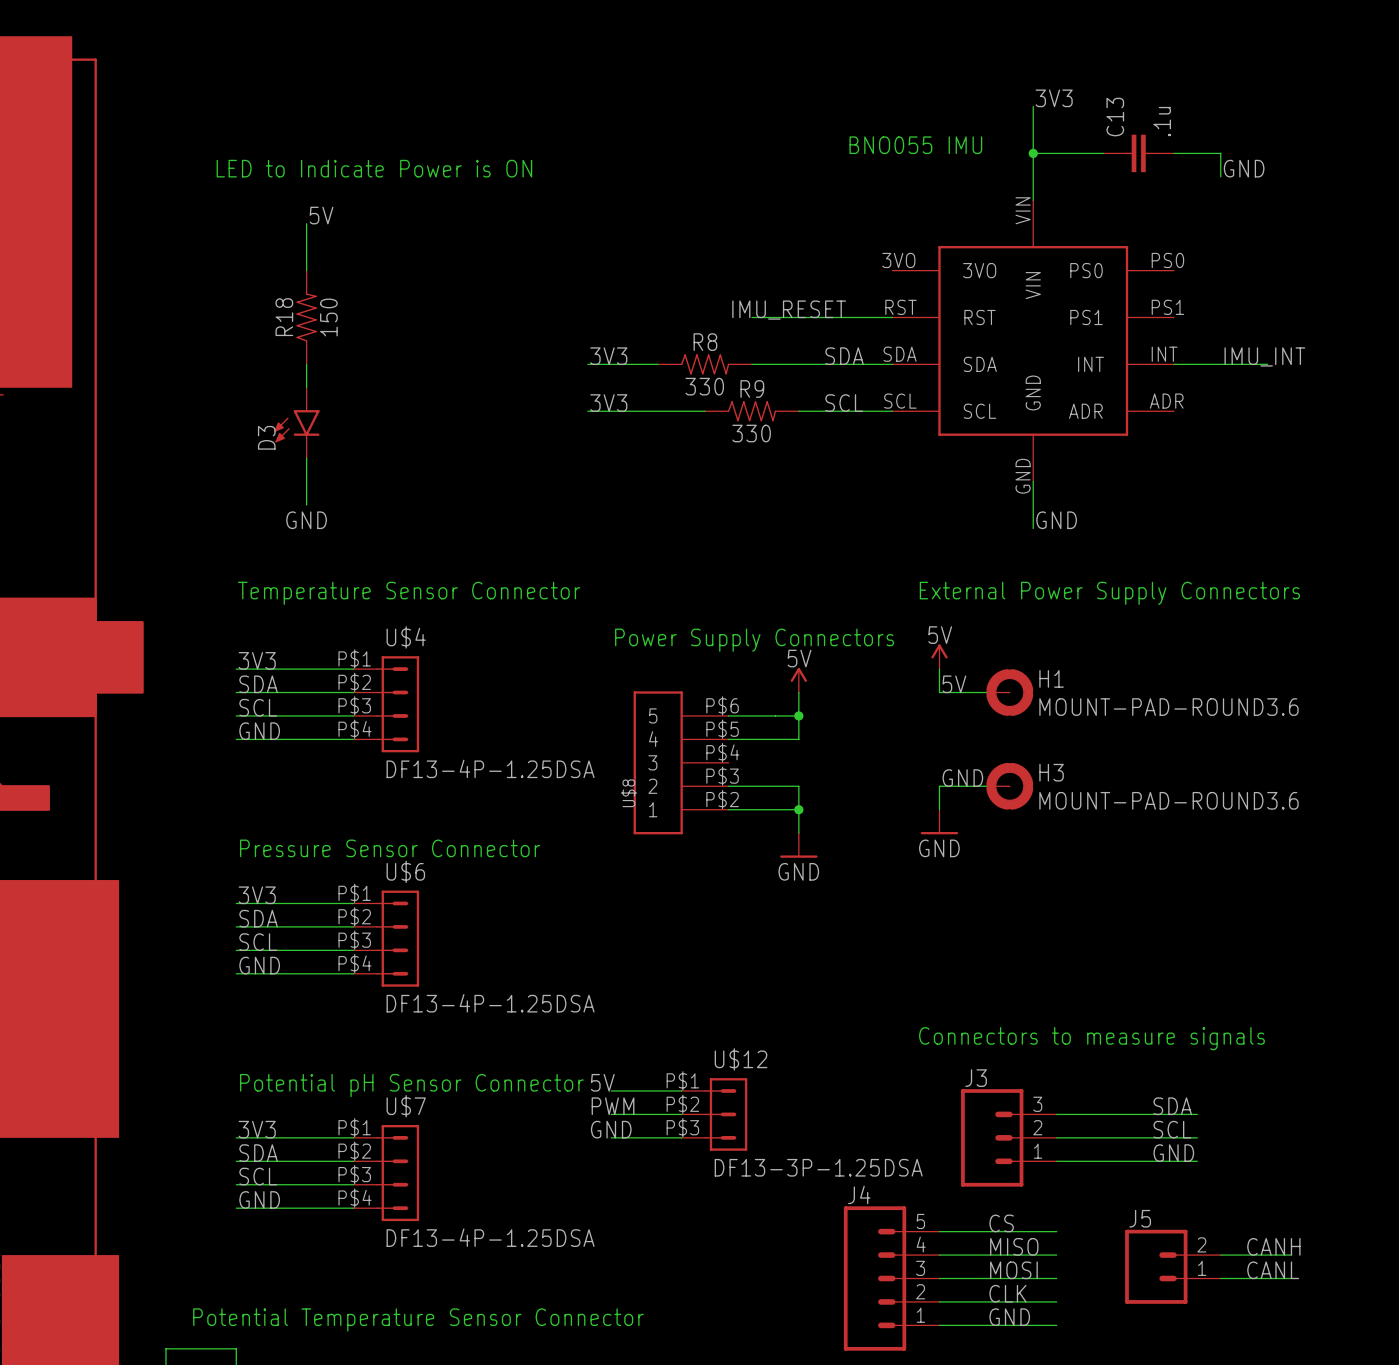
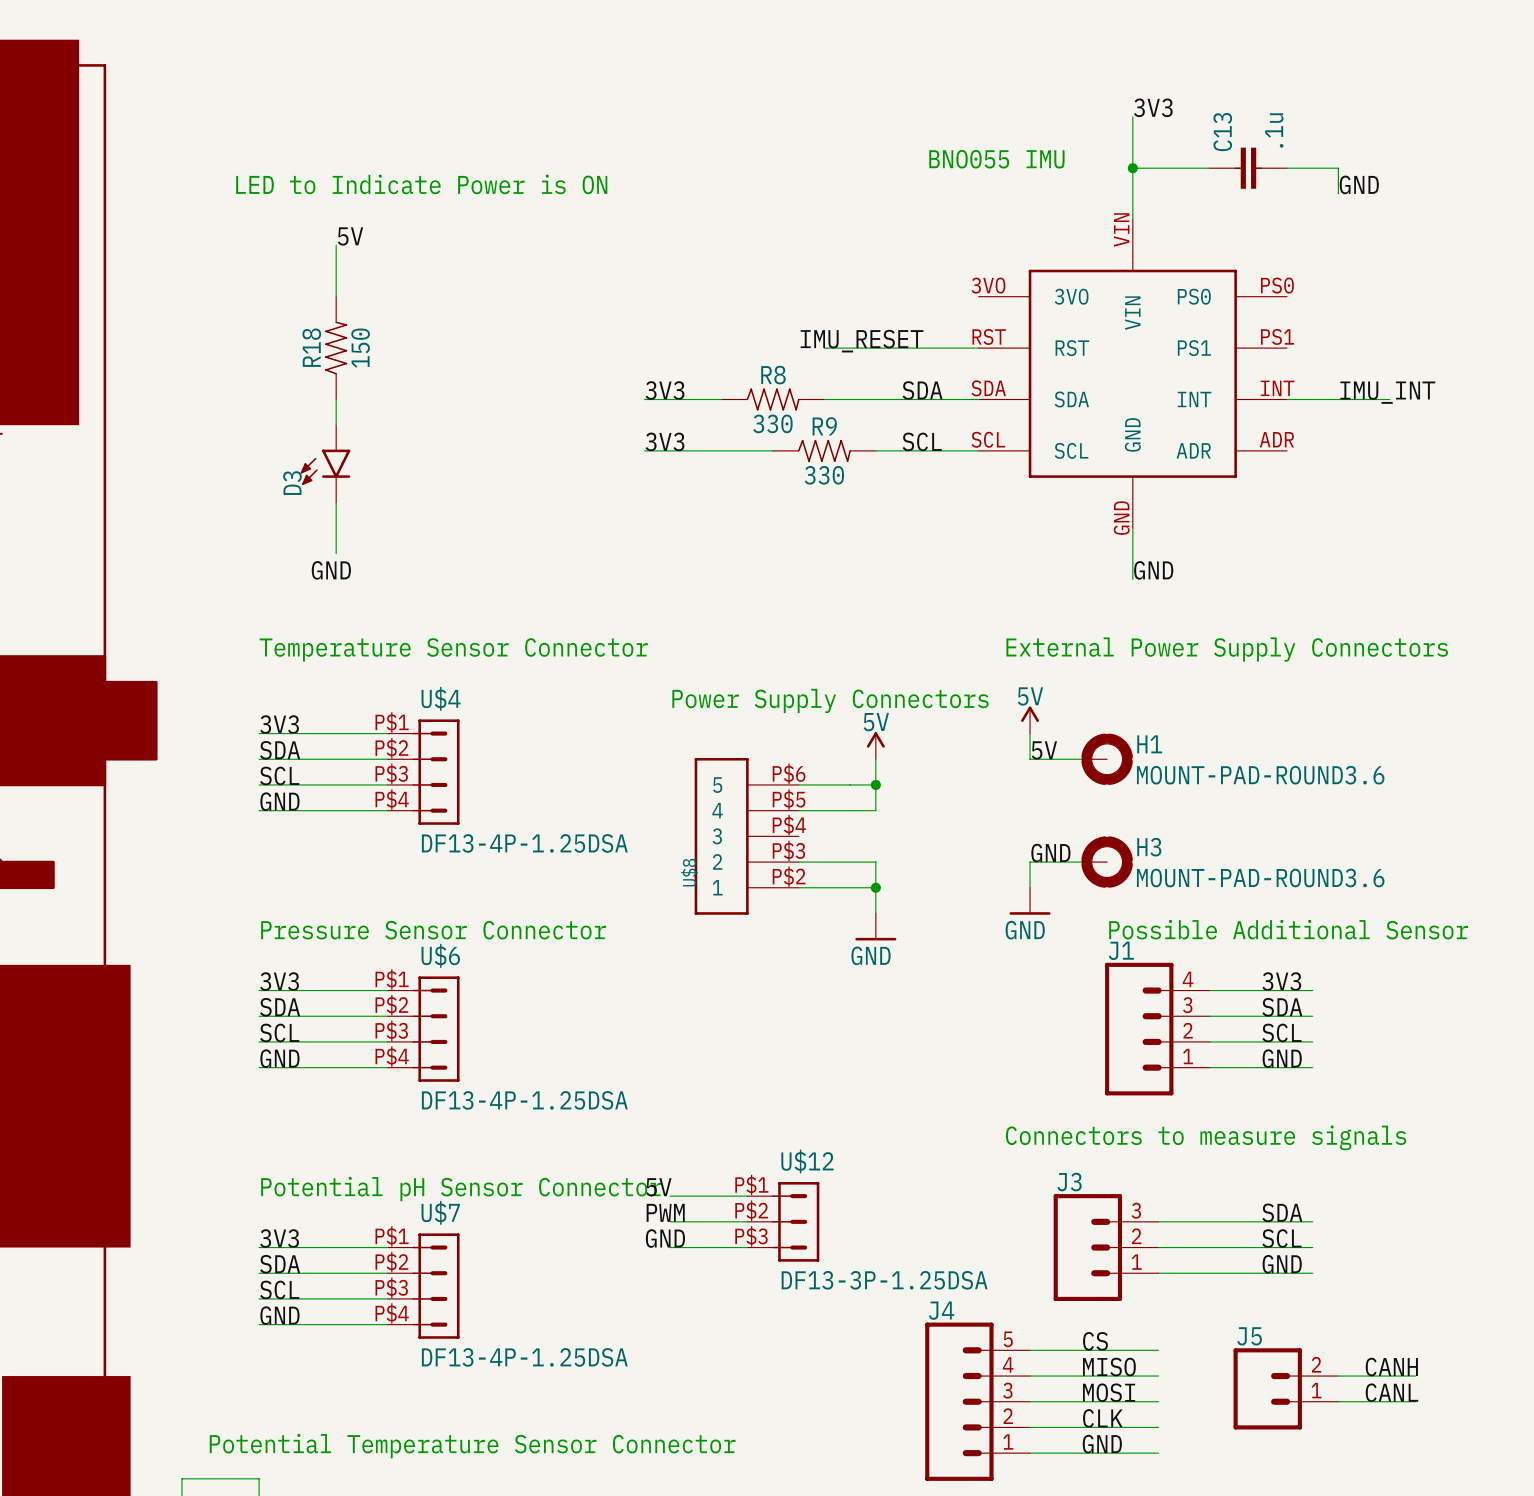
text: none -> Possible Additional Sensor (1288, 929)
label: none -> 3V3 (1281, 981)
wire: none -> (1209, 990) (1312, 990)
label: none -> SDA (1282, 1007)
wire: none -> (1209, 1016) (1312, 1016)
J1: none -> (1157, 1029)
label: none -> SCL (1281, 1032)
wire: none -> (1209, 1041) (1312, 1041)
label: none -> GND (1282, 1058)
wire: none -> (1209, 1067) (1312, 1067)

